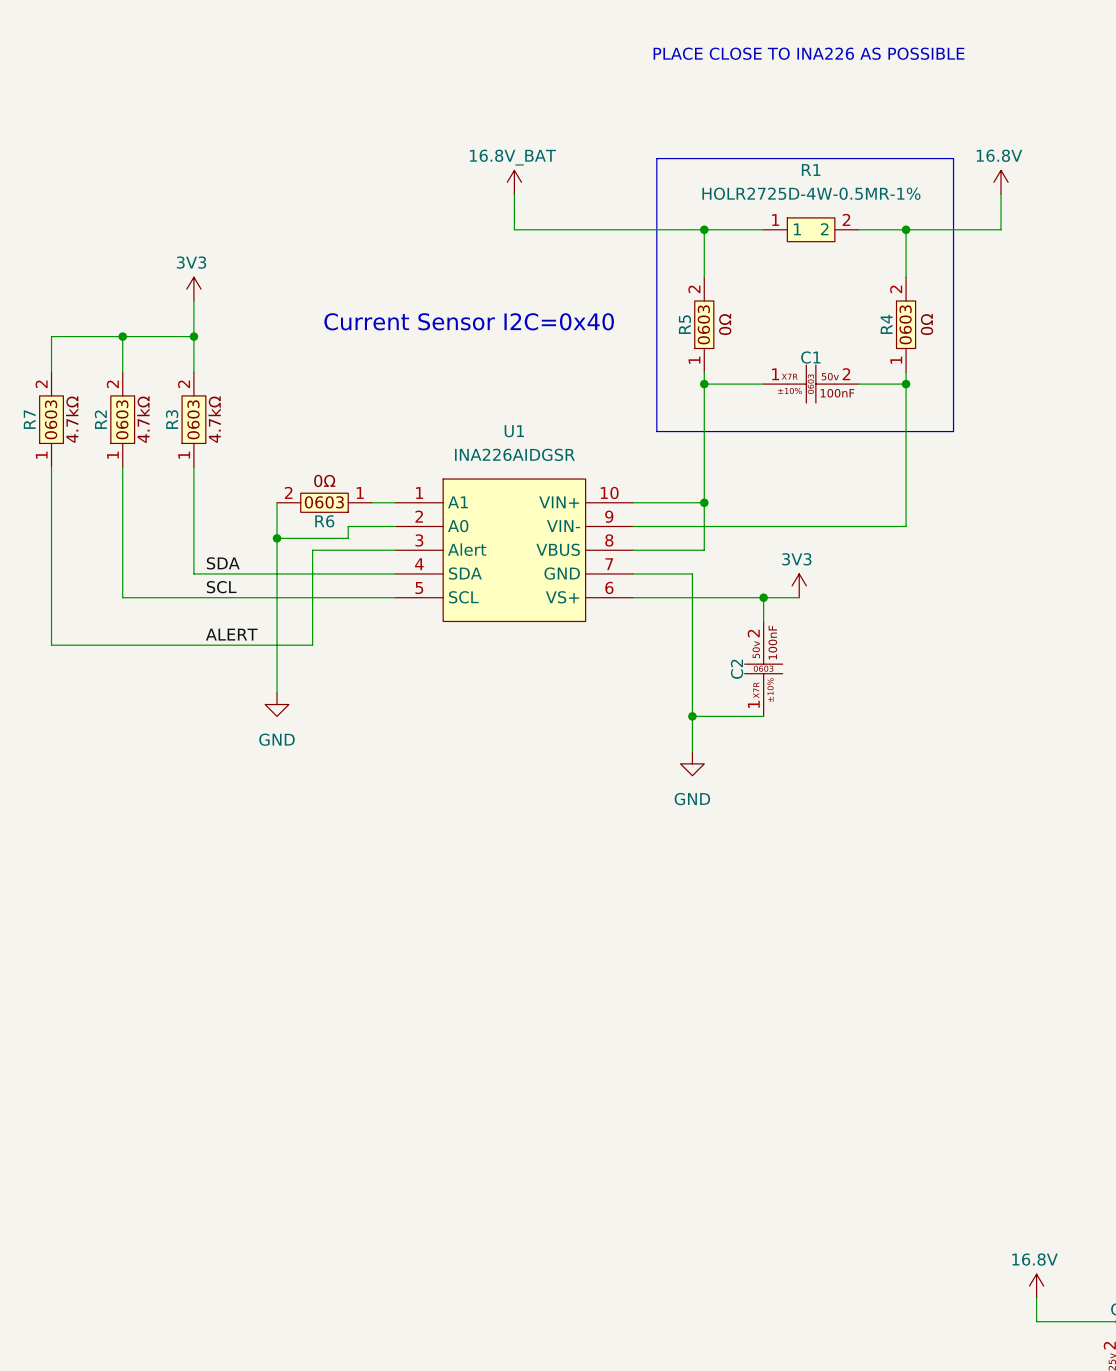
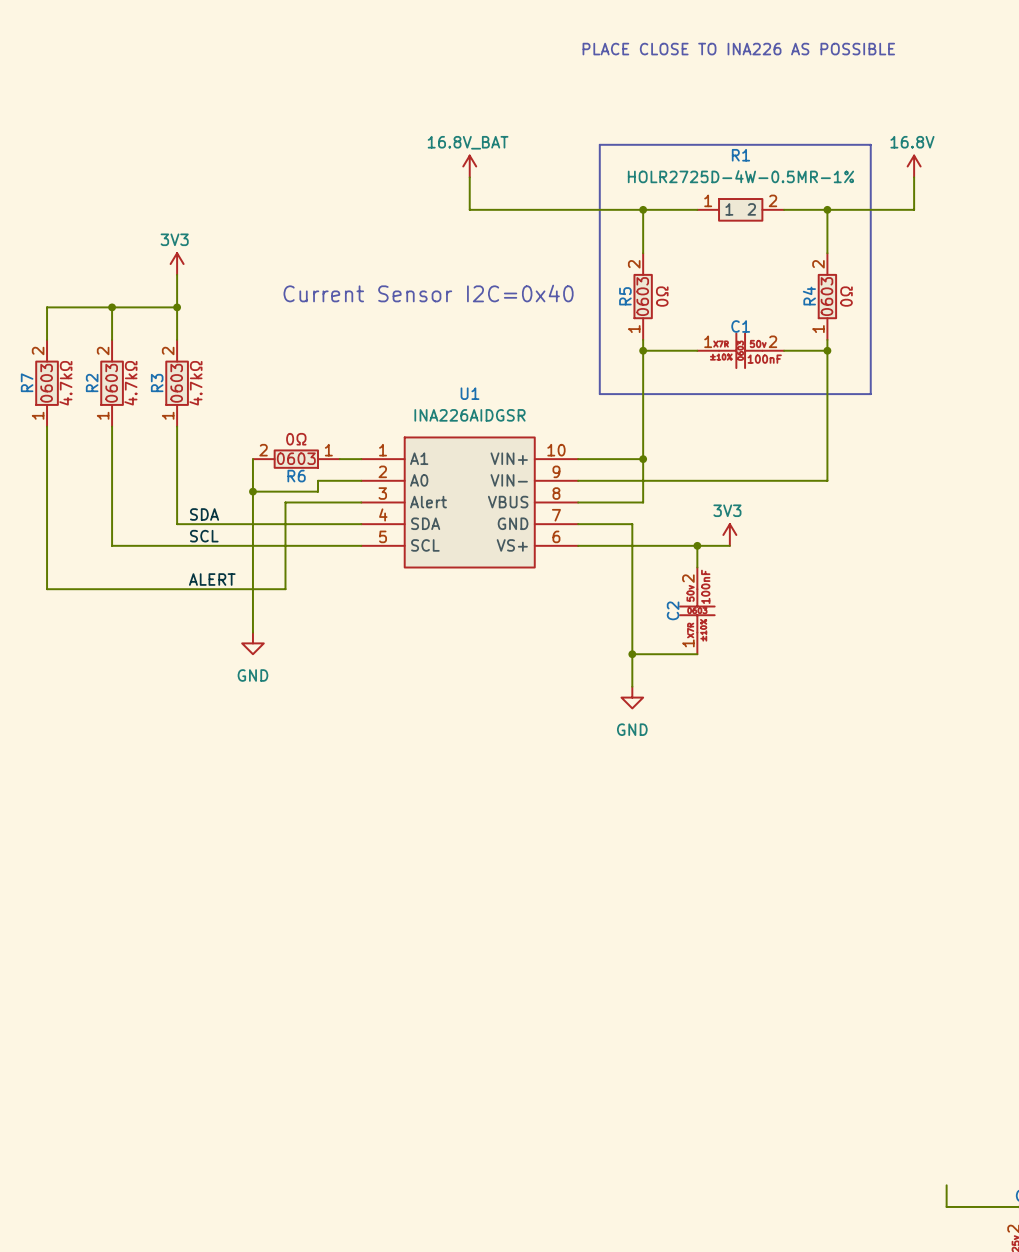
power symbol: 16.8V (1036, 1286) -> none

